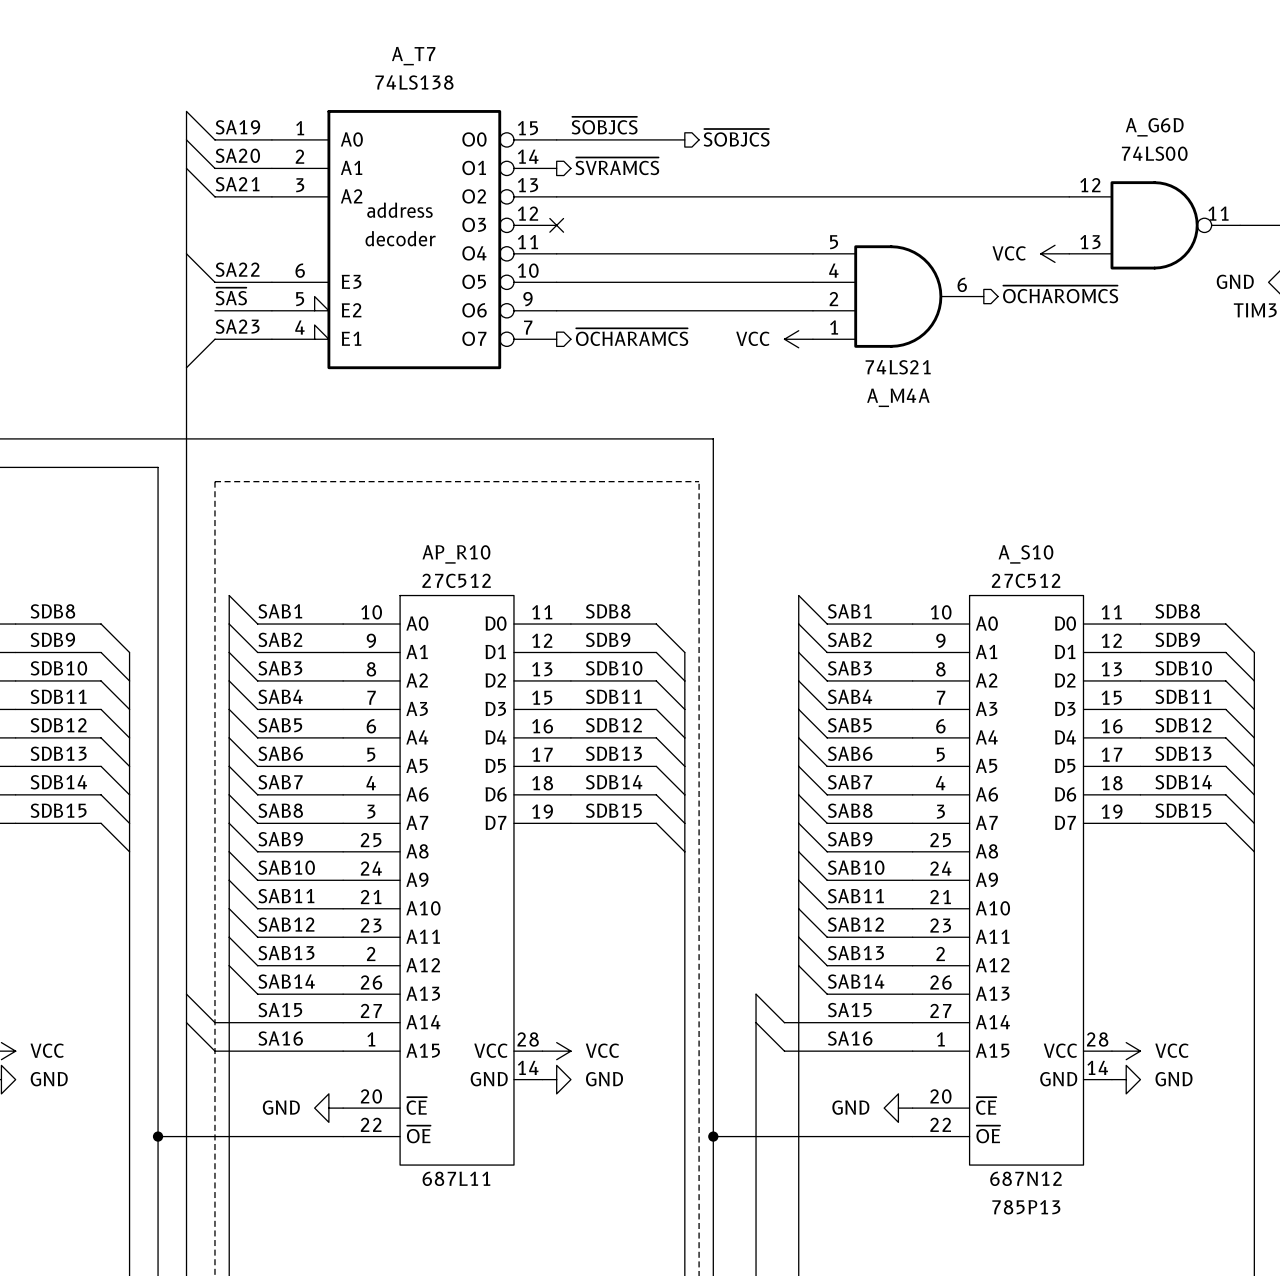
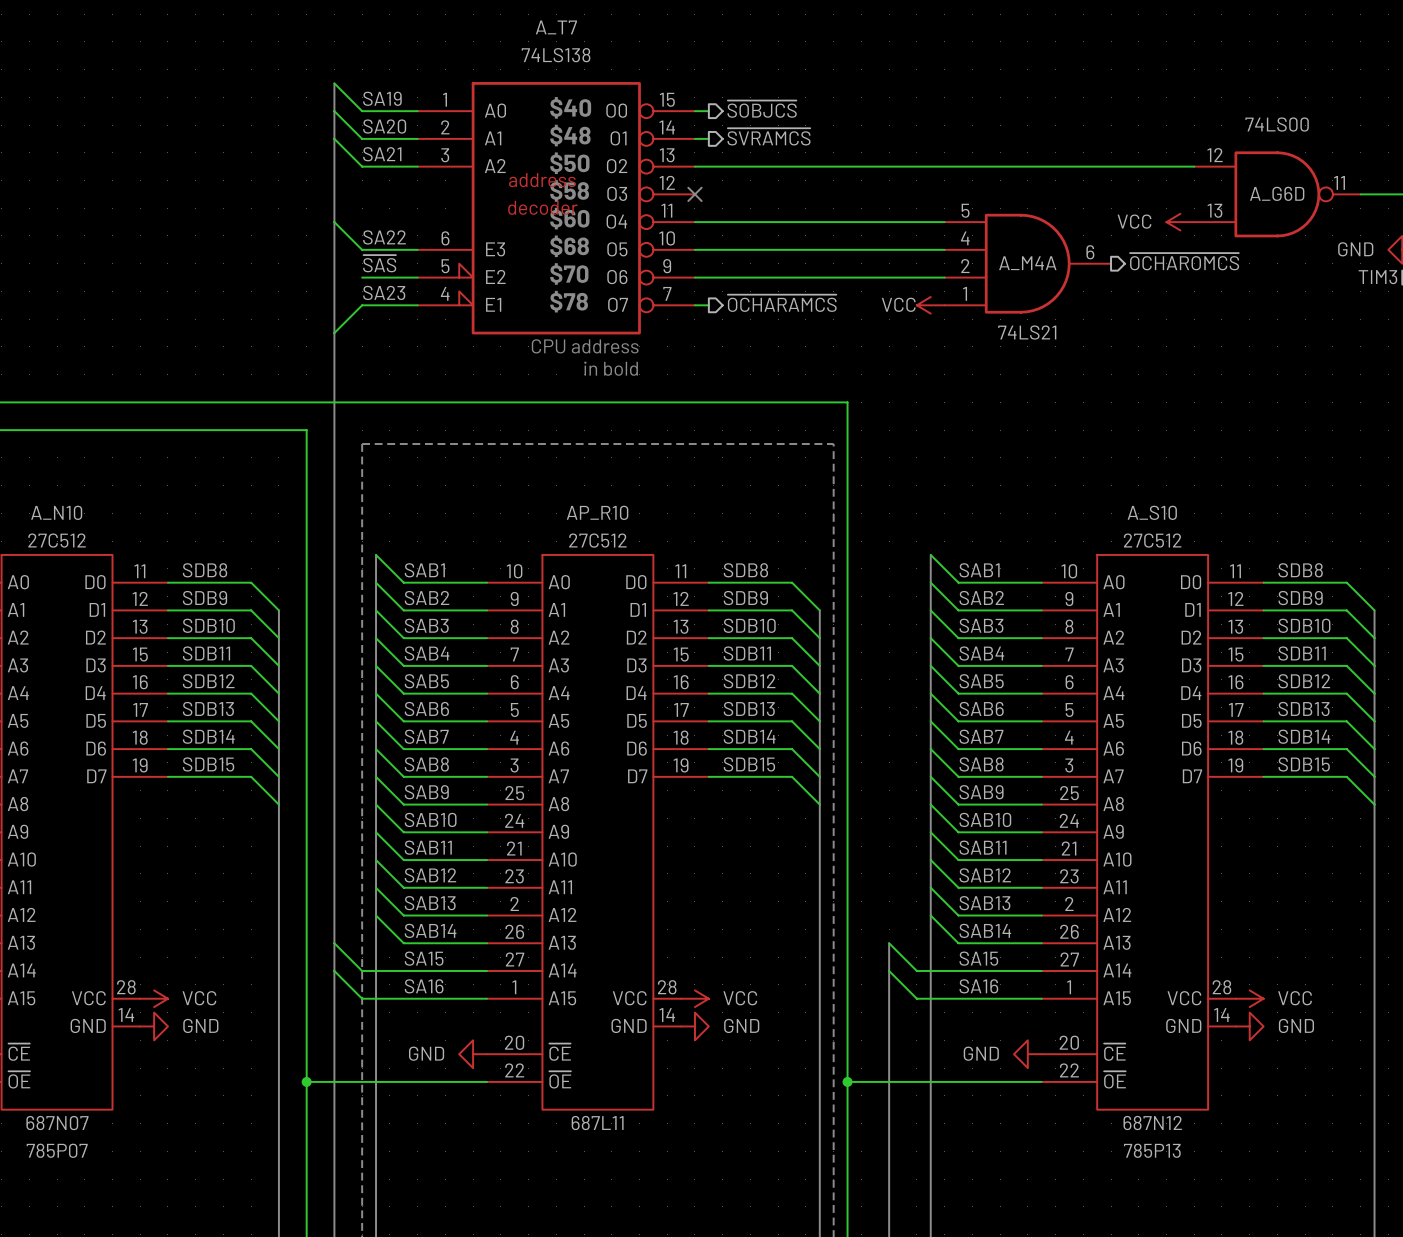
label: ~{SOBJCS} (604, 125) -> none
A_G6D name position: A_G6D (1154, 127) -> A_G6D (1277, 193)
text: none -> $40 (570, 107)
hierarchical label position: ~{SOBJCS} (736, 137) -> ~{SOBJCS} (762, 109)
wire: (570, 139) (684, 139) -> none
text: none -> $48 (570, 135)
hierarchical label position: ~{SVRAMCS} (617, 166) -> ~{SVRAMCS} (769, 136)
wire: none -> (694, 138) (708, 138)
text: none -> $50 (569, 163)
text: none -> $58 (569, 190)
text: none -> $60 (569, 218)
text: none -> $68 (569, 246)
text: none -> $70 (569, 273)
text: none -> $78 (569, 301)
hierarchical label position: ~{OCHARAMCS} (632, 337) -> ~{OCHARAMCS} (782, 303)
power symbol text position: VCC (752, 338) -> VCC (898, 304)
wire: none -> (694, 305) (708, 305)
text: none -> CPU address (585, 346)
A_M4A name position: A_M4A (898, 397) -> A_M4A (1027, 263)
text: none -> in bold (611, 368)

